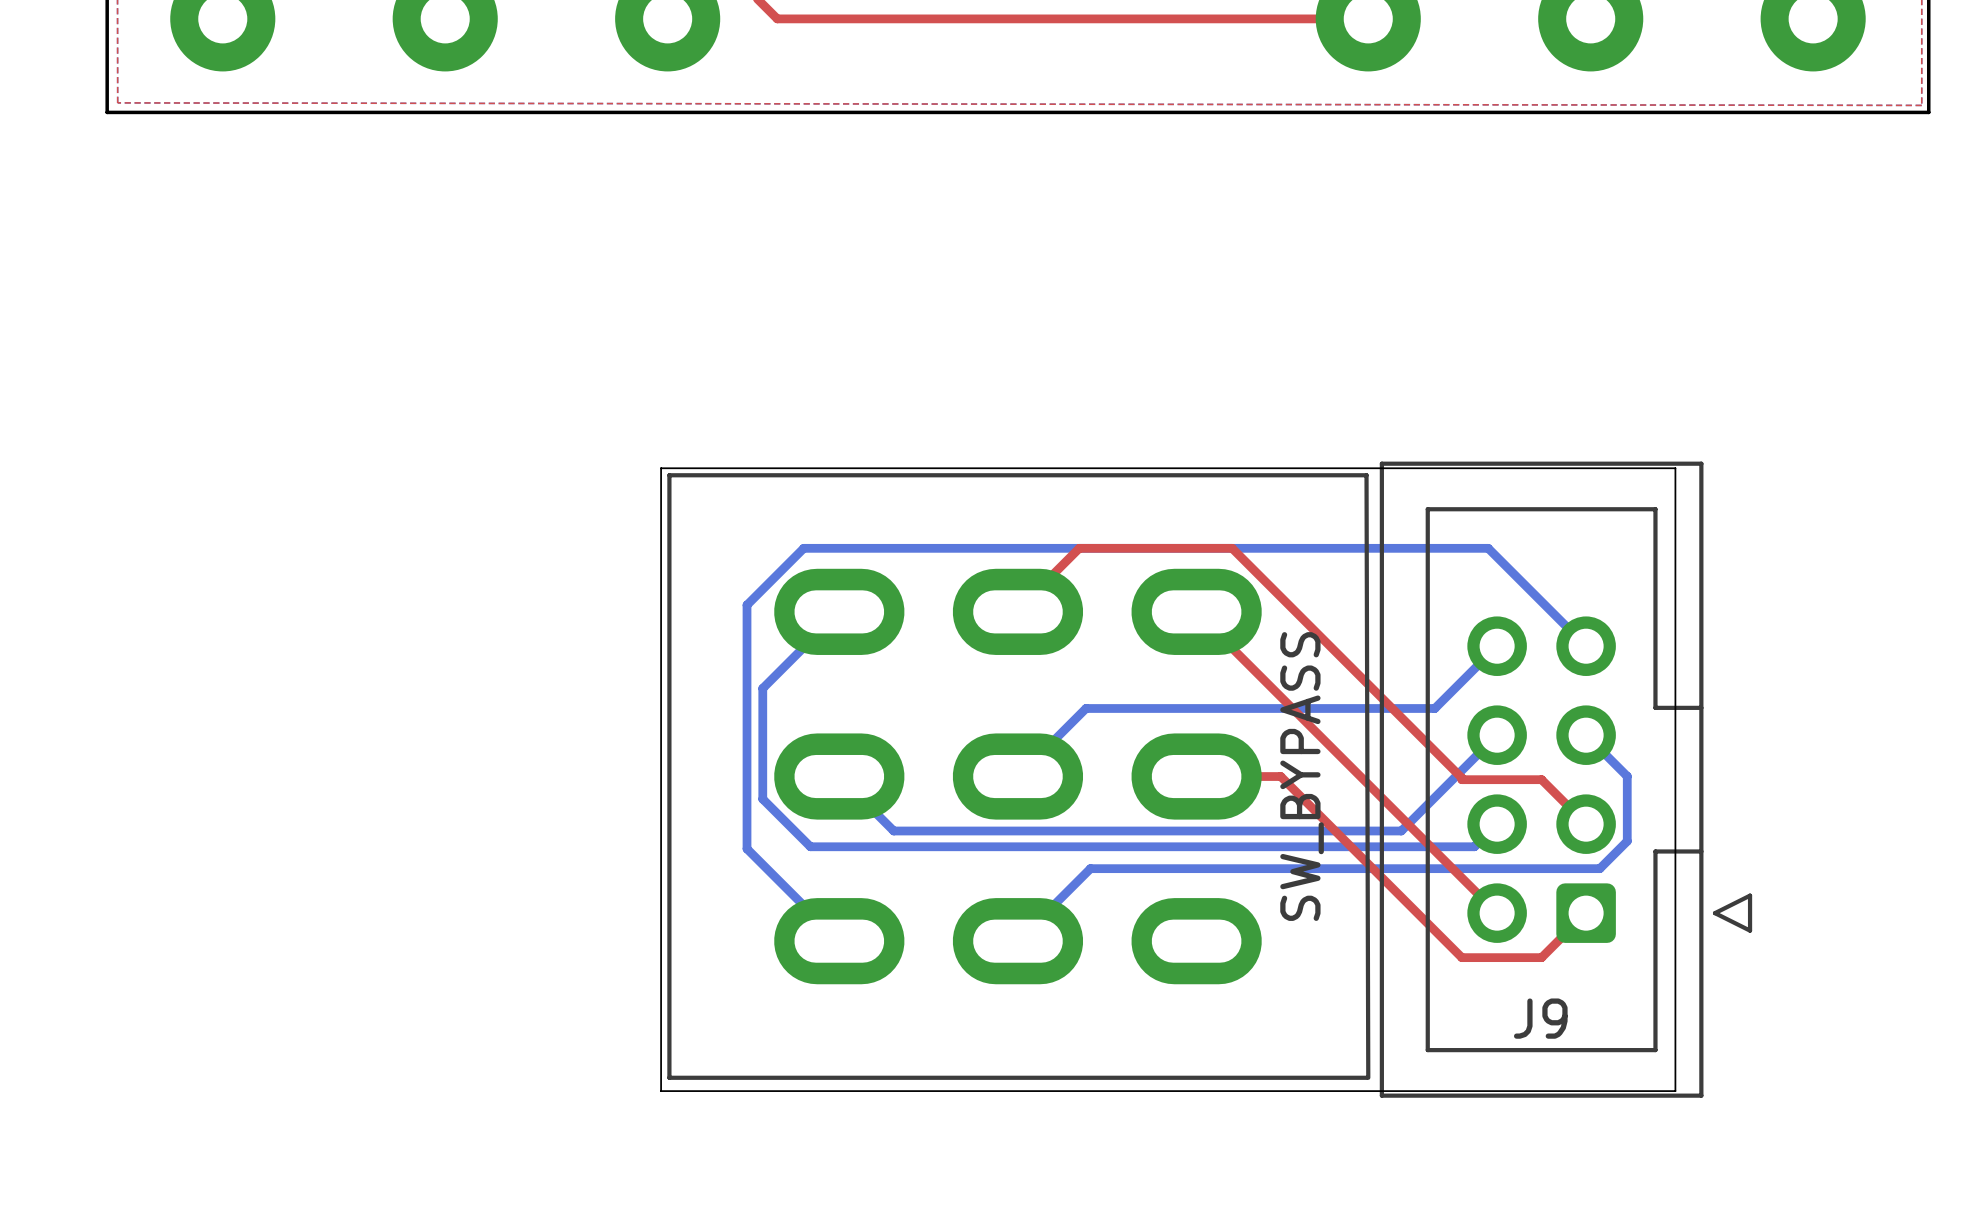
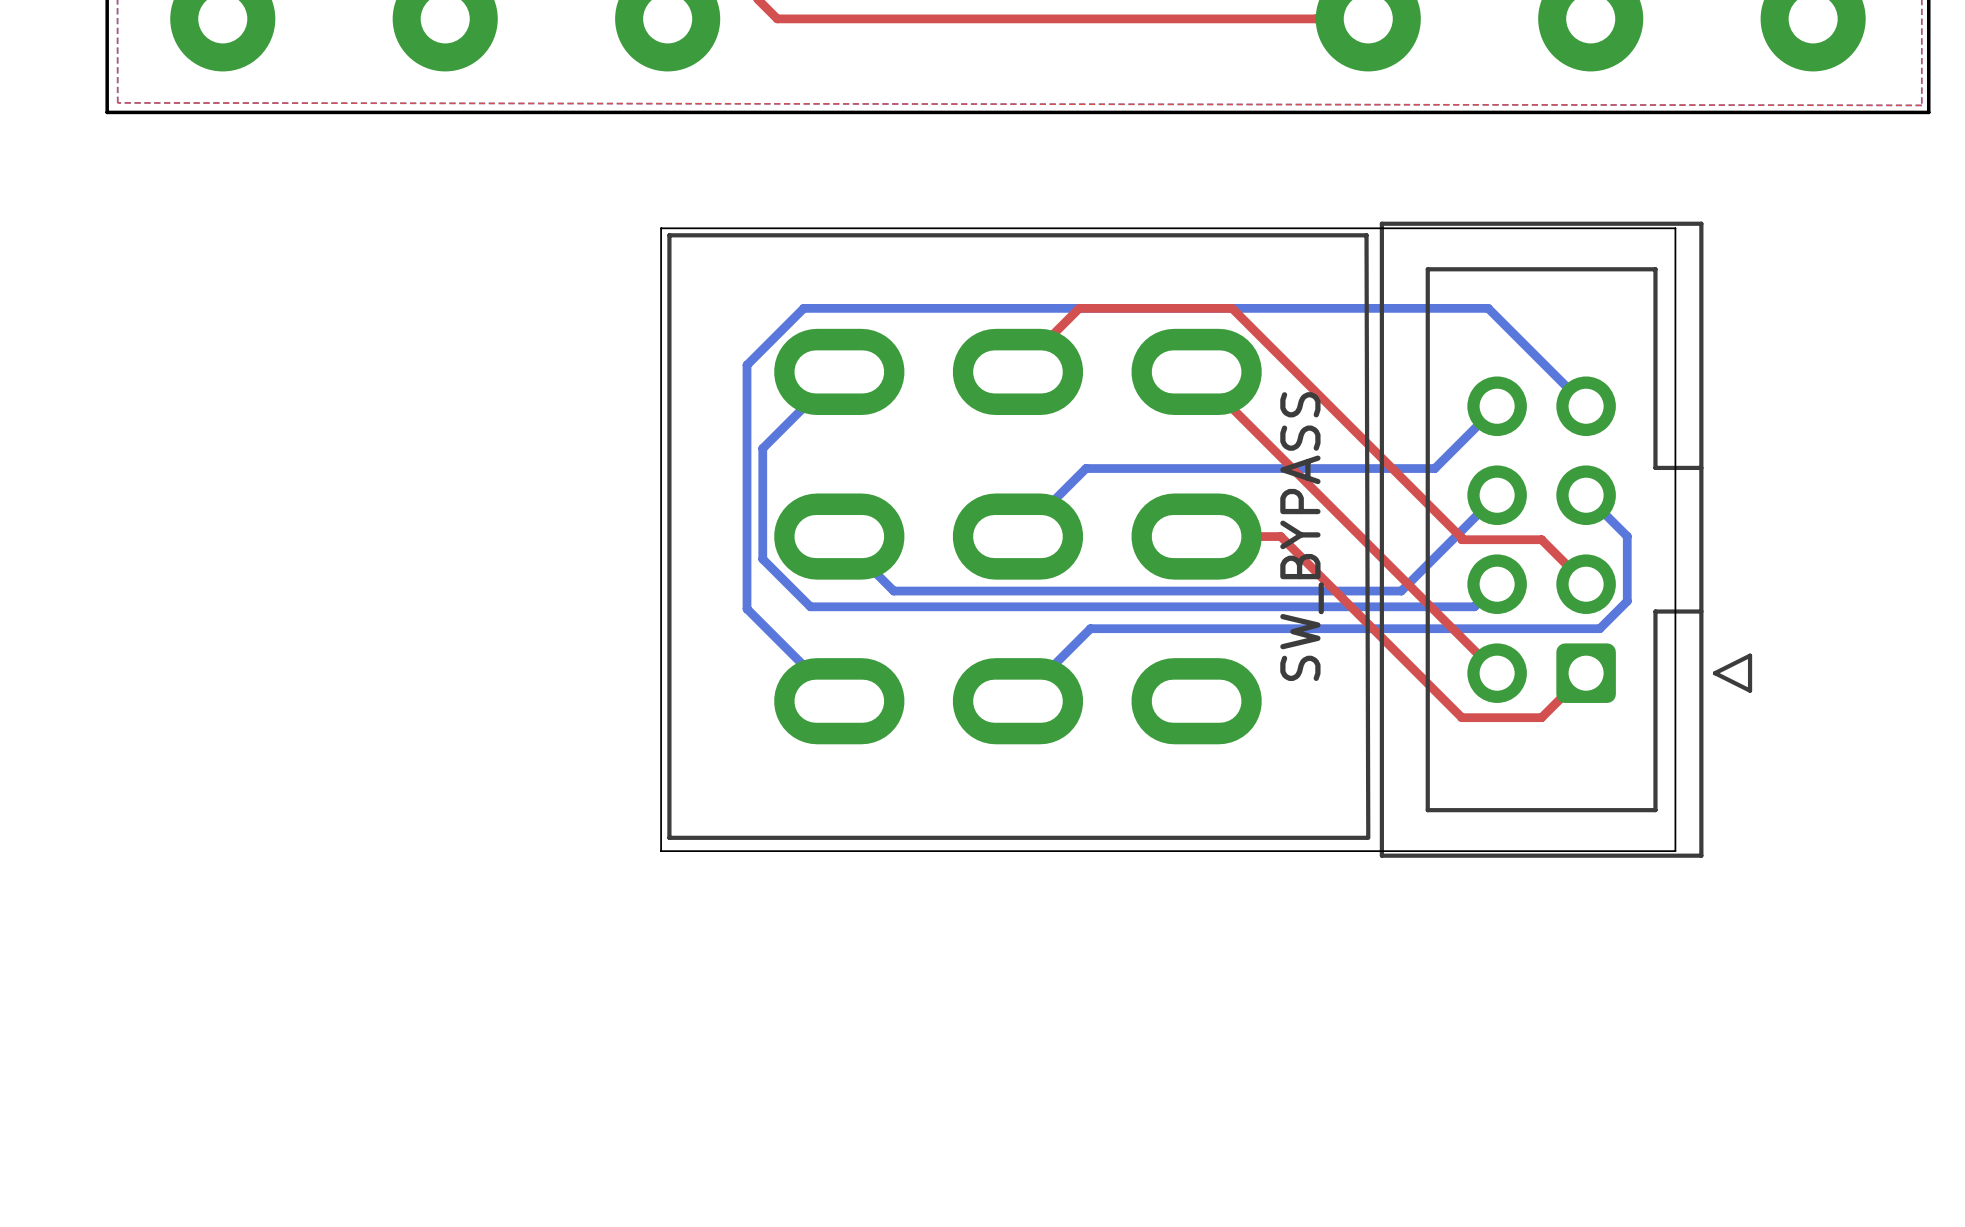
top track: none -> (1017, 369) (1079, 308) (1232, 308) (1461, 539) (1541, 539) (1586, 584)
top track: none -> (1196, 372) (1497, 673)
board edge: (661, 468) (1675, 468) -> (661, 468) (661, 228) (1675, 228) (1675, 468)
part: none -> (1565, 539)
bottom track: (747, 605) (803, 548) (1488, 548) (1586, 646) -> (747, 605) (747, 365) (803, 308) (1488, 308) (1586, 406)
bottom track: (747, 608) (747, 848) (839, 941) -> (747, 608) (839, 701)
bottom track: (839, 611) (762, 688) (762, 799) (810, 846) (1474, 846) (1497, 824) -> (839, 371) (762, 448) (762, 559) (810, 606) (1474, 606) (1497, 584)
top track: (1017, 611) (1017, 609) (1079, 548) (1232, 548) (1461, 779) (1541, 779) (1586, 824) -> none
top track: (1196, 611) (1497, 913) -> none
bottom track: (1497, 646) (1434, 708) (1085, 708) (1017, 776) -> (1497, 406) (1434, 468) (1085, 468) (1017, 536)
bottom track: (1497, 735) (1401, 830) (893, 830) (839, 776) -> (1497, 495) (1401, 591) (893, 591) (839, 536)
bottom track: (1586, 735) (1627, 776) (1627, 841) (1599, 868) (1090, 868) (1017, 941) -> (1586, 495) (1627, 536) (1627, 601) (1599, 628) (1090, 628) (1017, 701)
part position: (1018, 776) -> (1018, 536)
top track: (1196, 776) (1280, 776) (1461, 957) (1541, 957) (1586, 913) -> (1196, 536) (1280, 536) (1461, 717) (1541, 717) (1586, 673)
J9: (1565, 779) -> none
board edge: (661, 851) (661, 1091) (1675, 1091) (1675, 851) -> (661, 851) (1675, 851)

